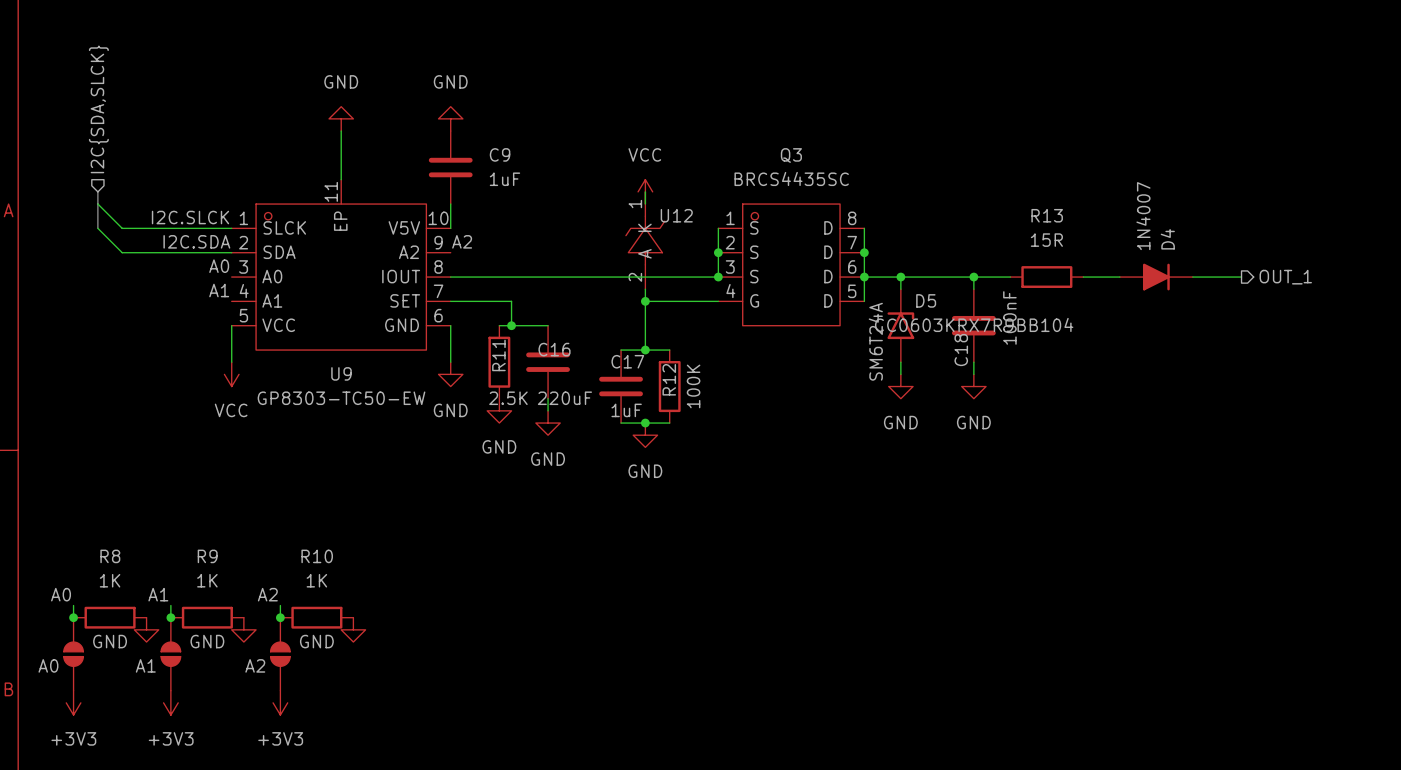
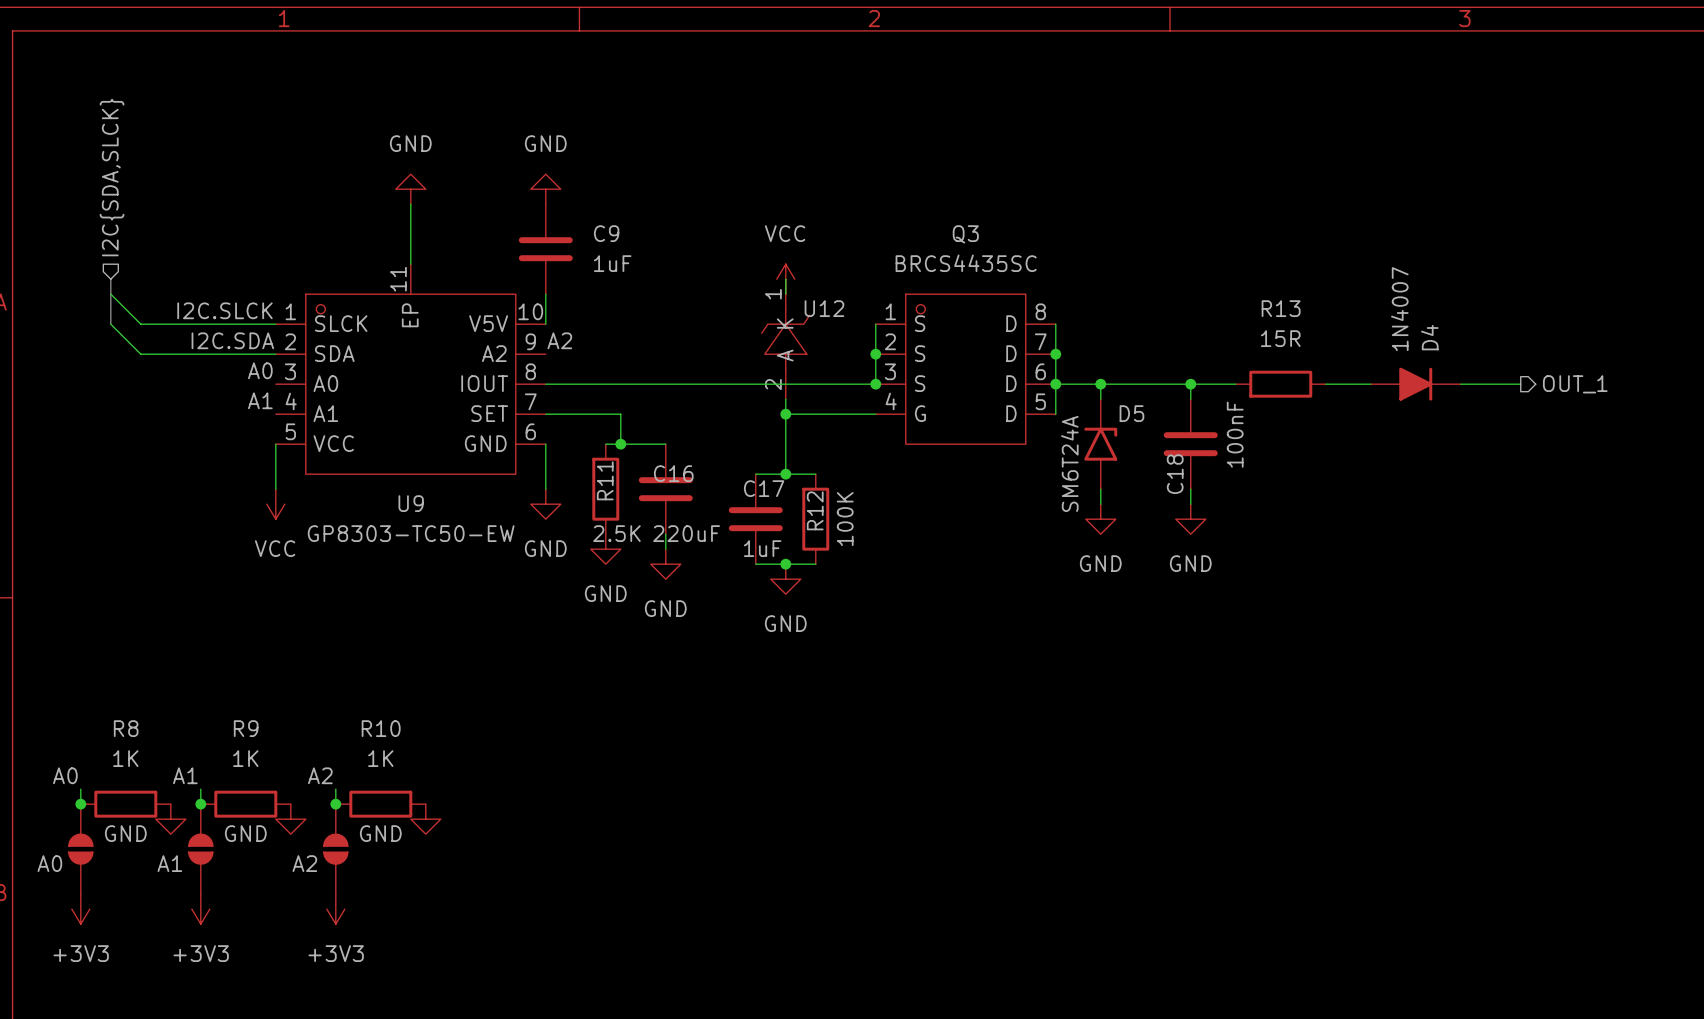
C18 text: CC0603KRX7R9BB104 (974, 324) -> none

